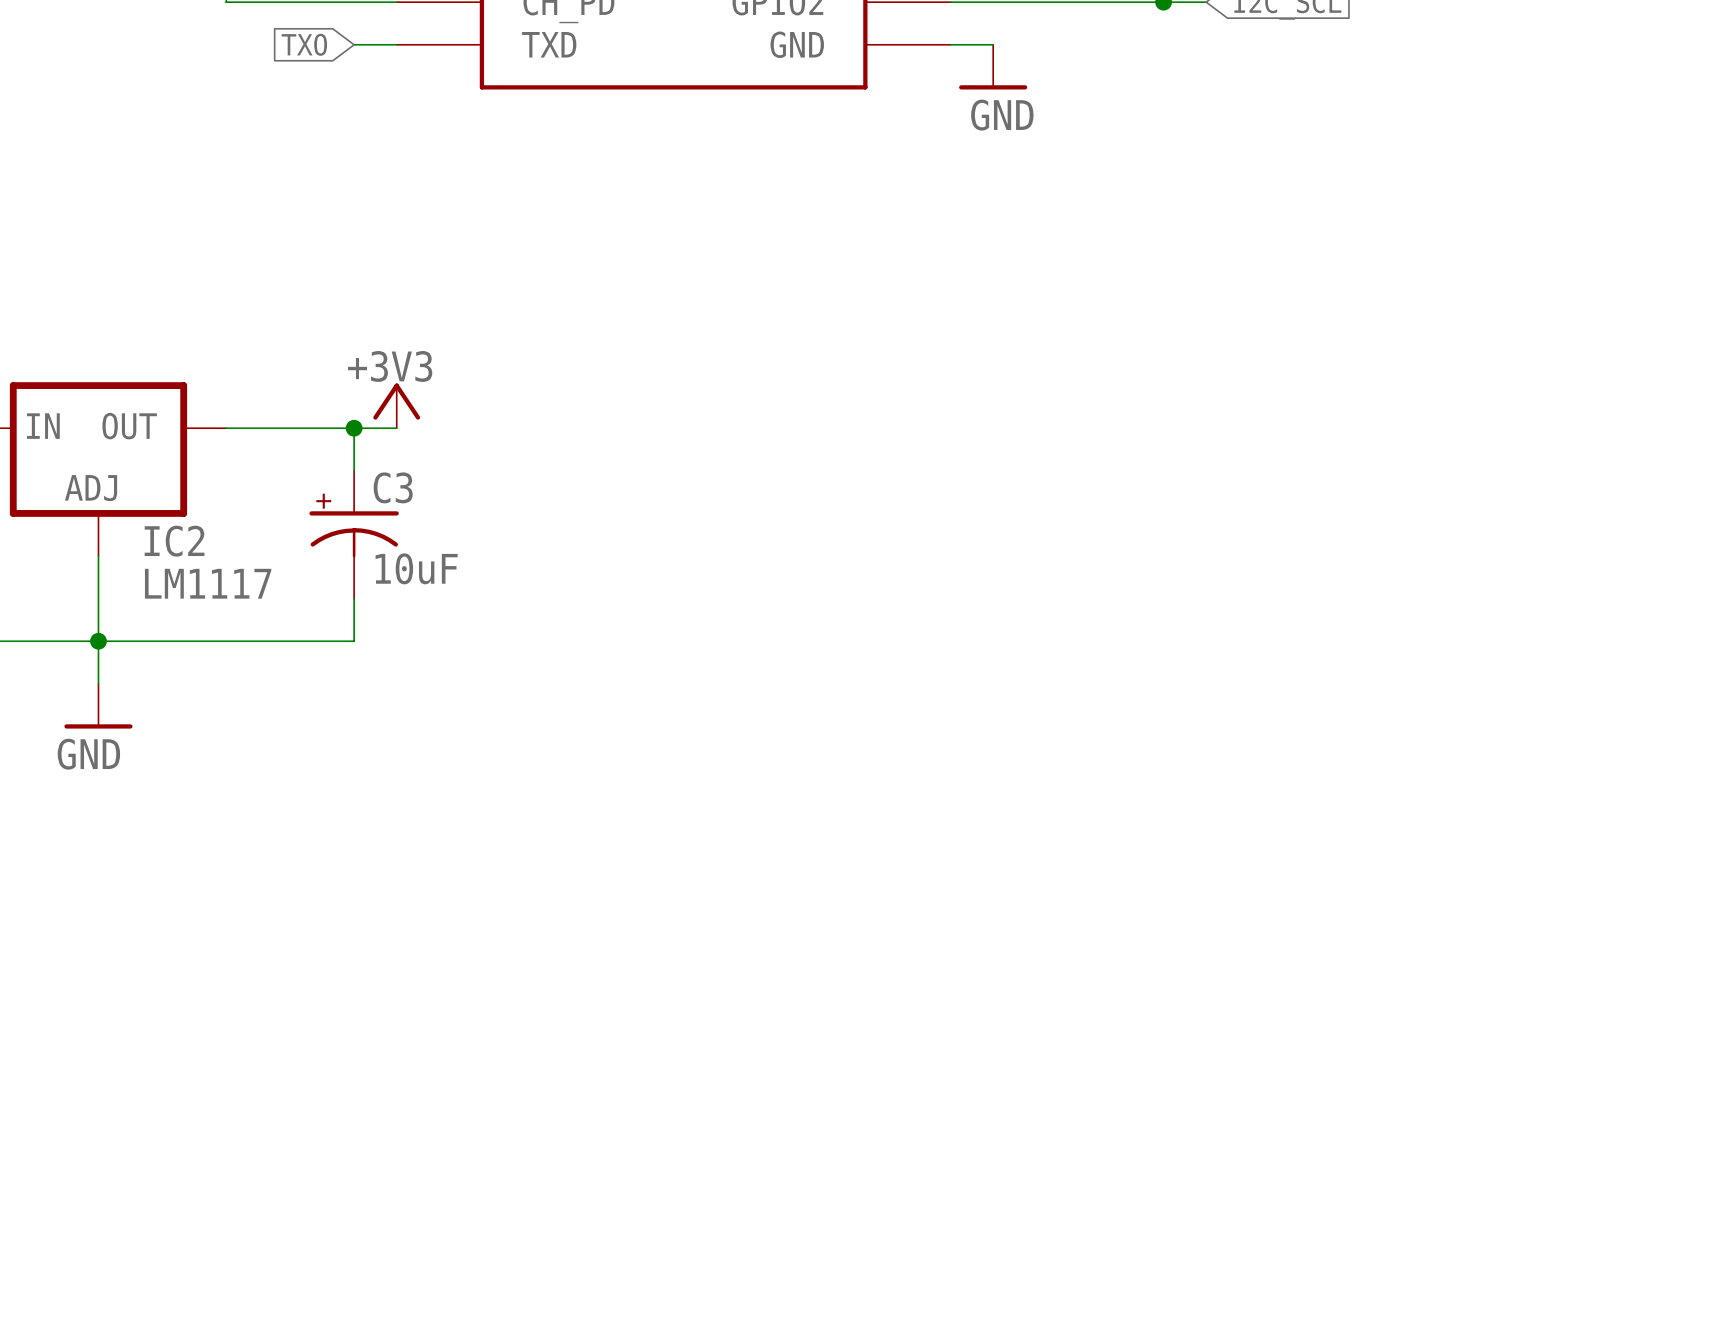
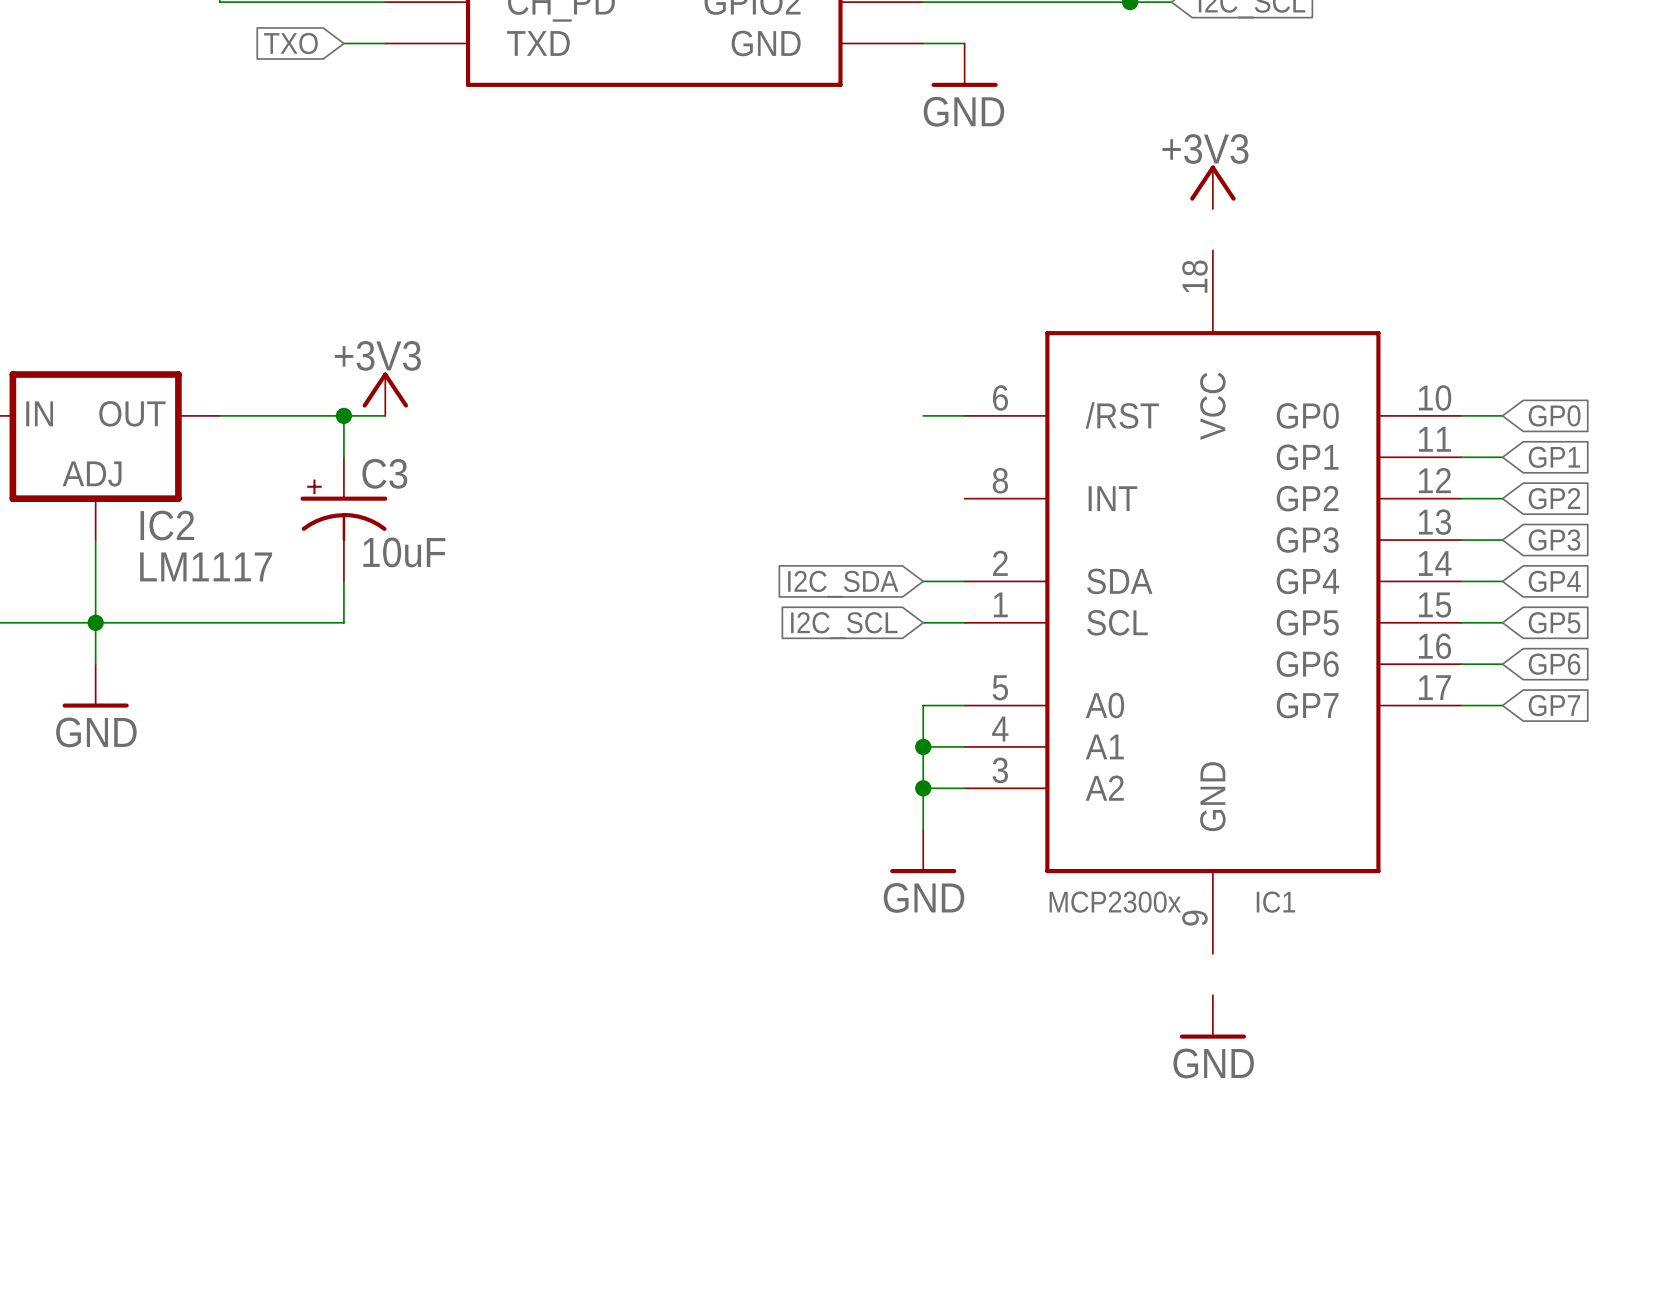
power symbol: none -> +3V3 (1212, 187)
wire: none -> (923, 415) (964, 415)
wire: none -> (1461, 415) (1502, 415)
global label: none -> GP0 (1554, 415)
wire: none -> (1461, 457) (1502, 457)
global label: none -> GP1 (1554, 457)
wire: none -> (1461, 498) (1502, 498)
global label: none -> GP2 (1554, 498)
wire: none -> (1461, 540) (1502, 540)
global label: none -> GP3 (1554, 540)
wire: none -> (923, 581) (964, 581)
wire: none -> (1461, 581) (1502, 581)
global label: none -> GP4 (1554, 581)
global label: none -> I2C_SDA (843, 584)
IC1: none -> (1212, 602)
wire: none -> (923, 622) (964, 622)
wire: none -> (1461, 622) (1502, 622)
global label: none -> GP5 (1554, 622)
global label: none -> I2C_SCL (844, 625)
wire: none -> (1461, 664) (1502, 664)
global label: none -> GP6 (1554, 664)
wire: none -> (964, 705) (923, 705) (923, 829)
wire: none -> (1461, 705) (1502, 705)
global label: none -> GP7 (1554, 705)
wire: none -> (923, 746) (964, 746)
junction: none -> (923, 746)
wire: none -> (923, 788) (964, 788)
junction: none -> (923, 788)
power symbol: none -> GND (923, 851)
power symbol: none -> GND (1212, 1016)

